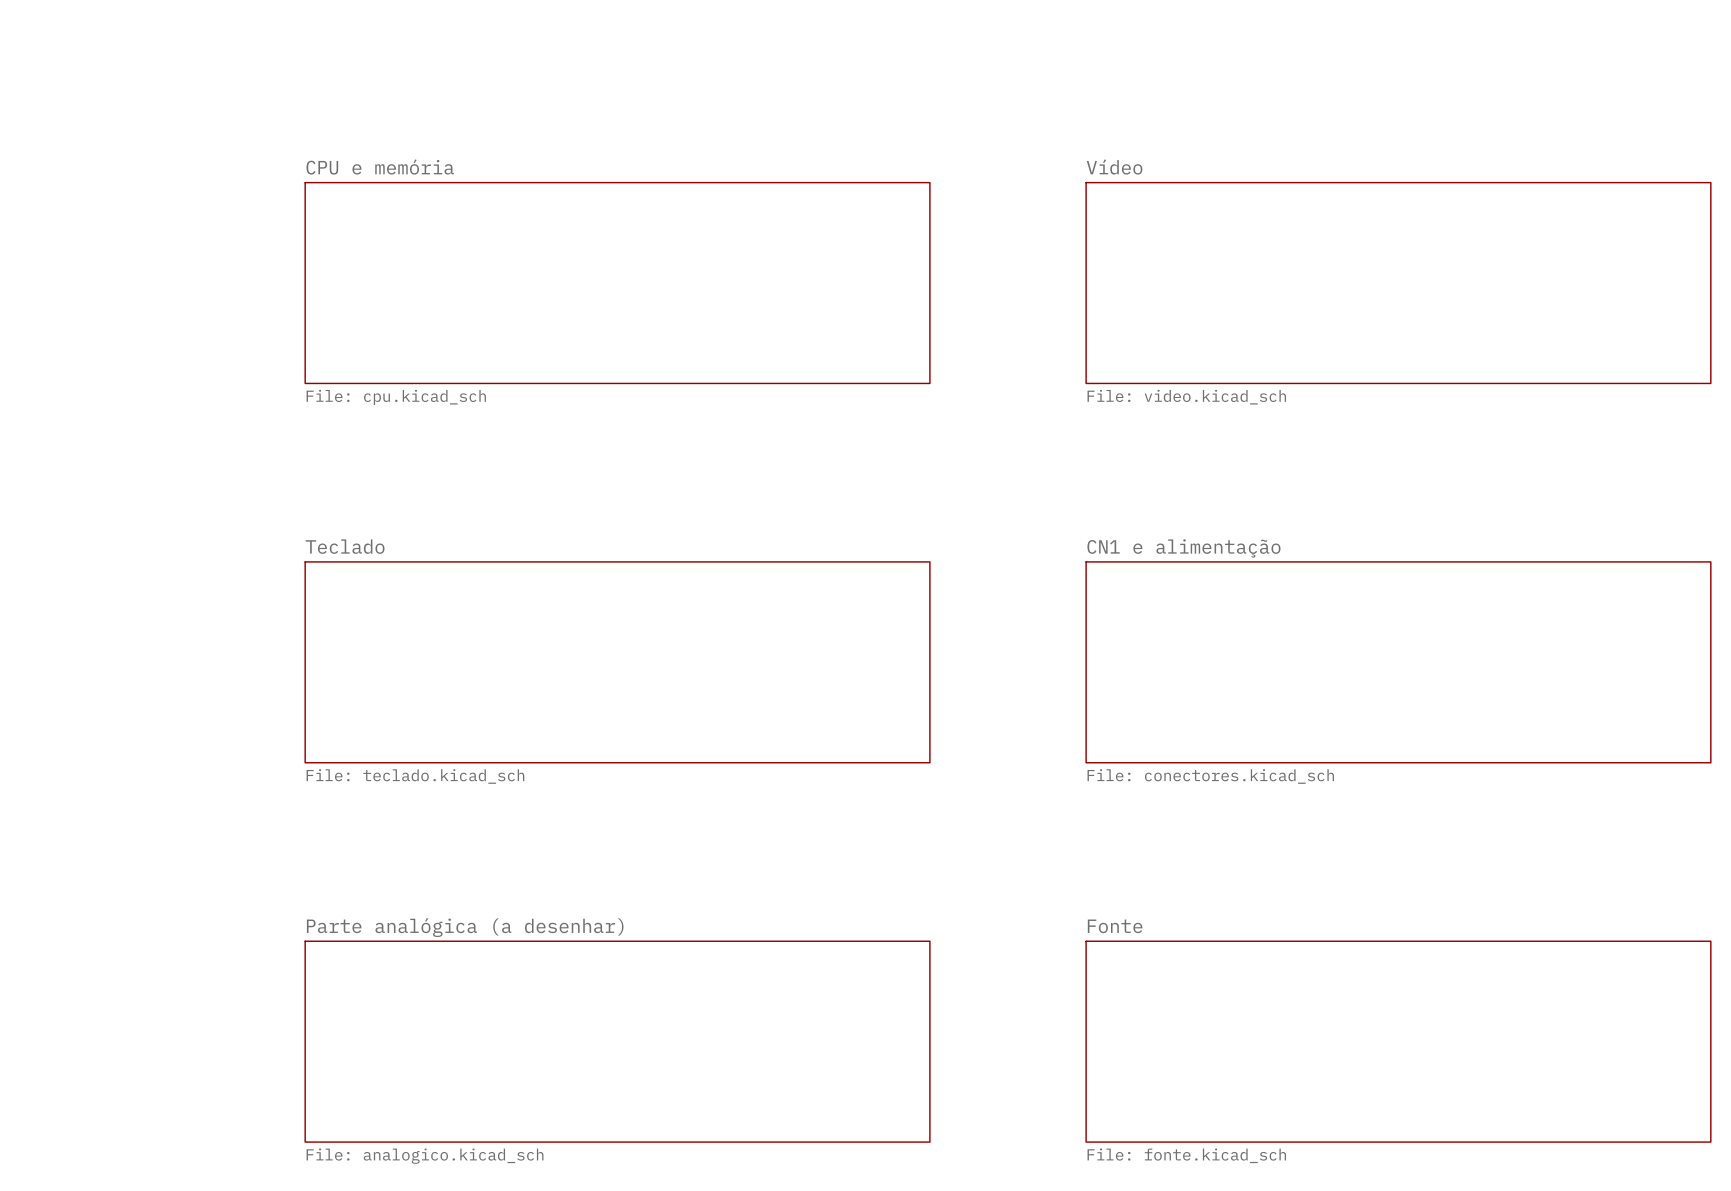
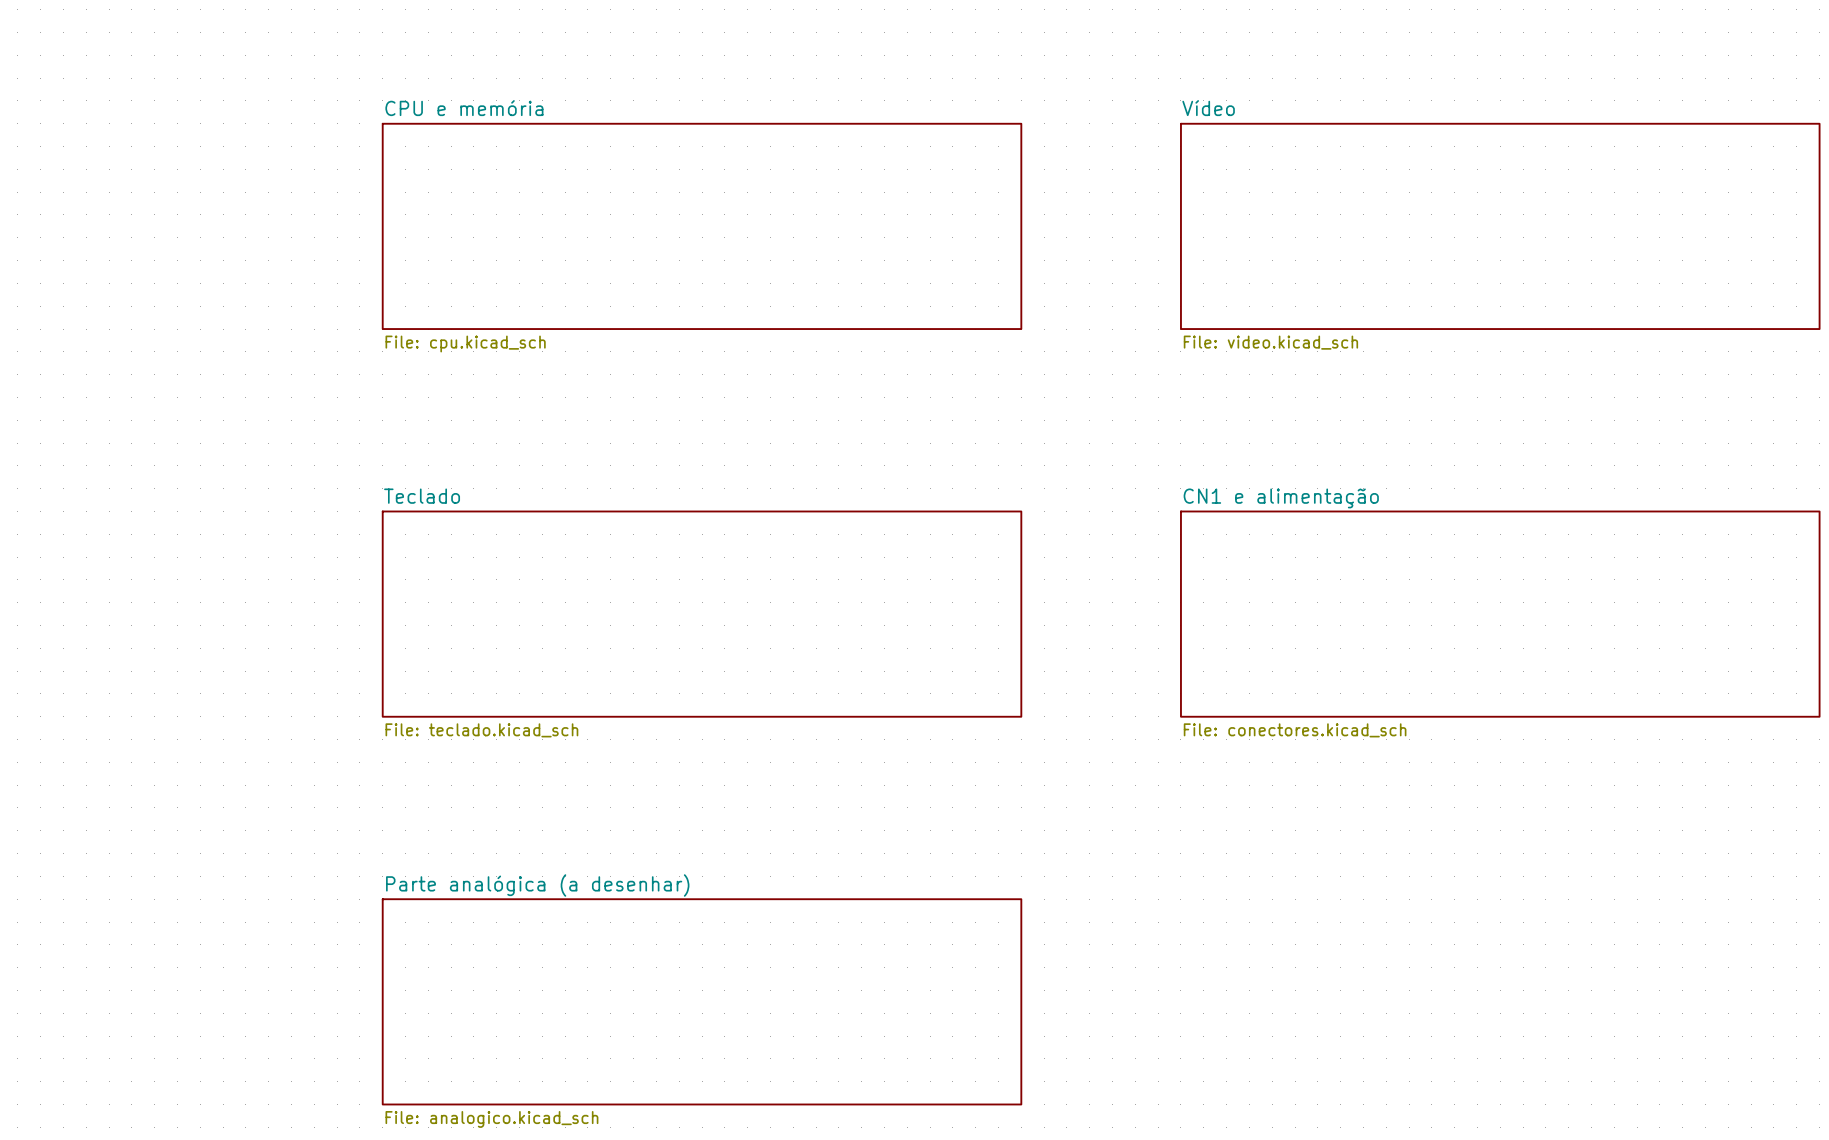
sheet Fonte: File: fonte.kicad_sch (1398, 1041) -> none

